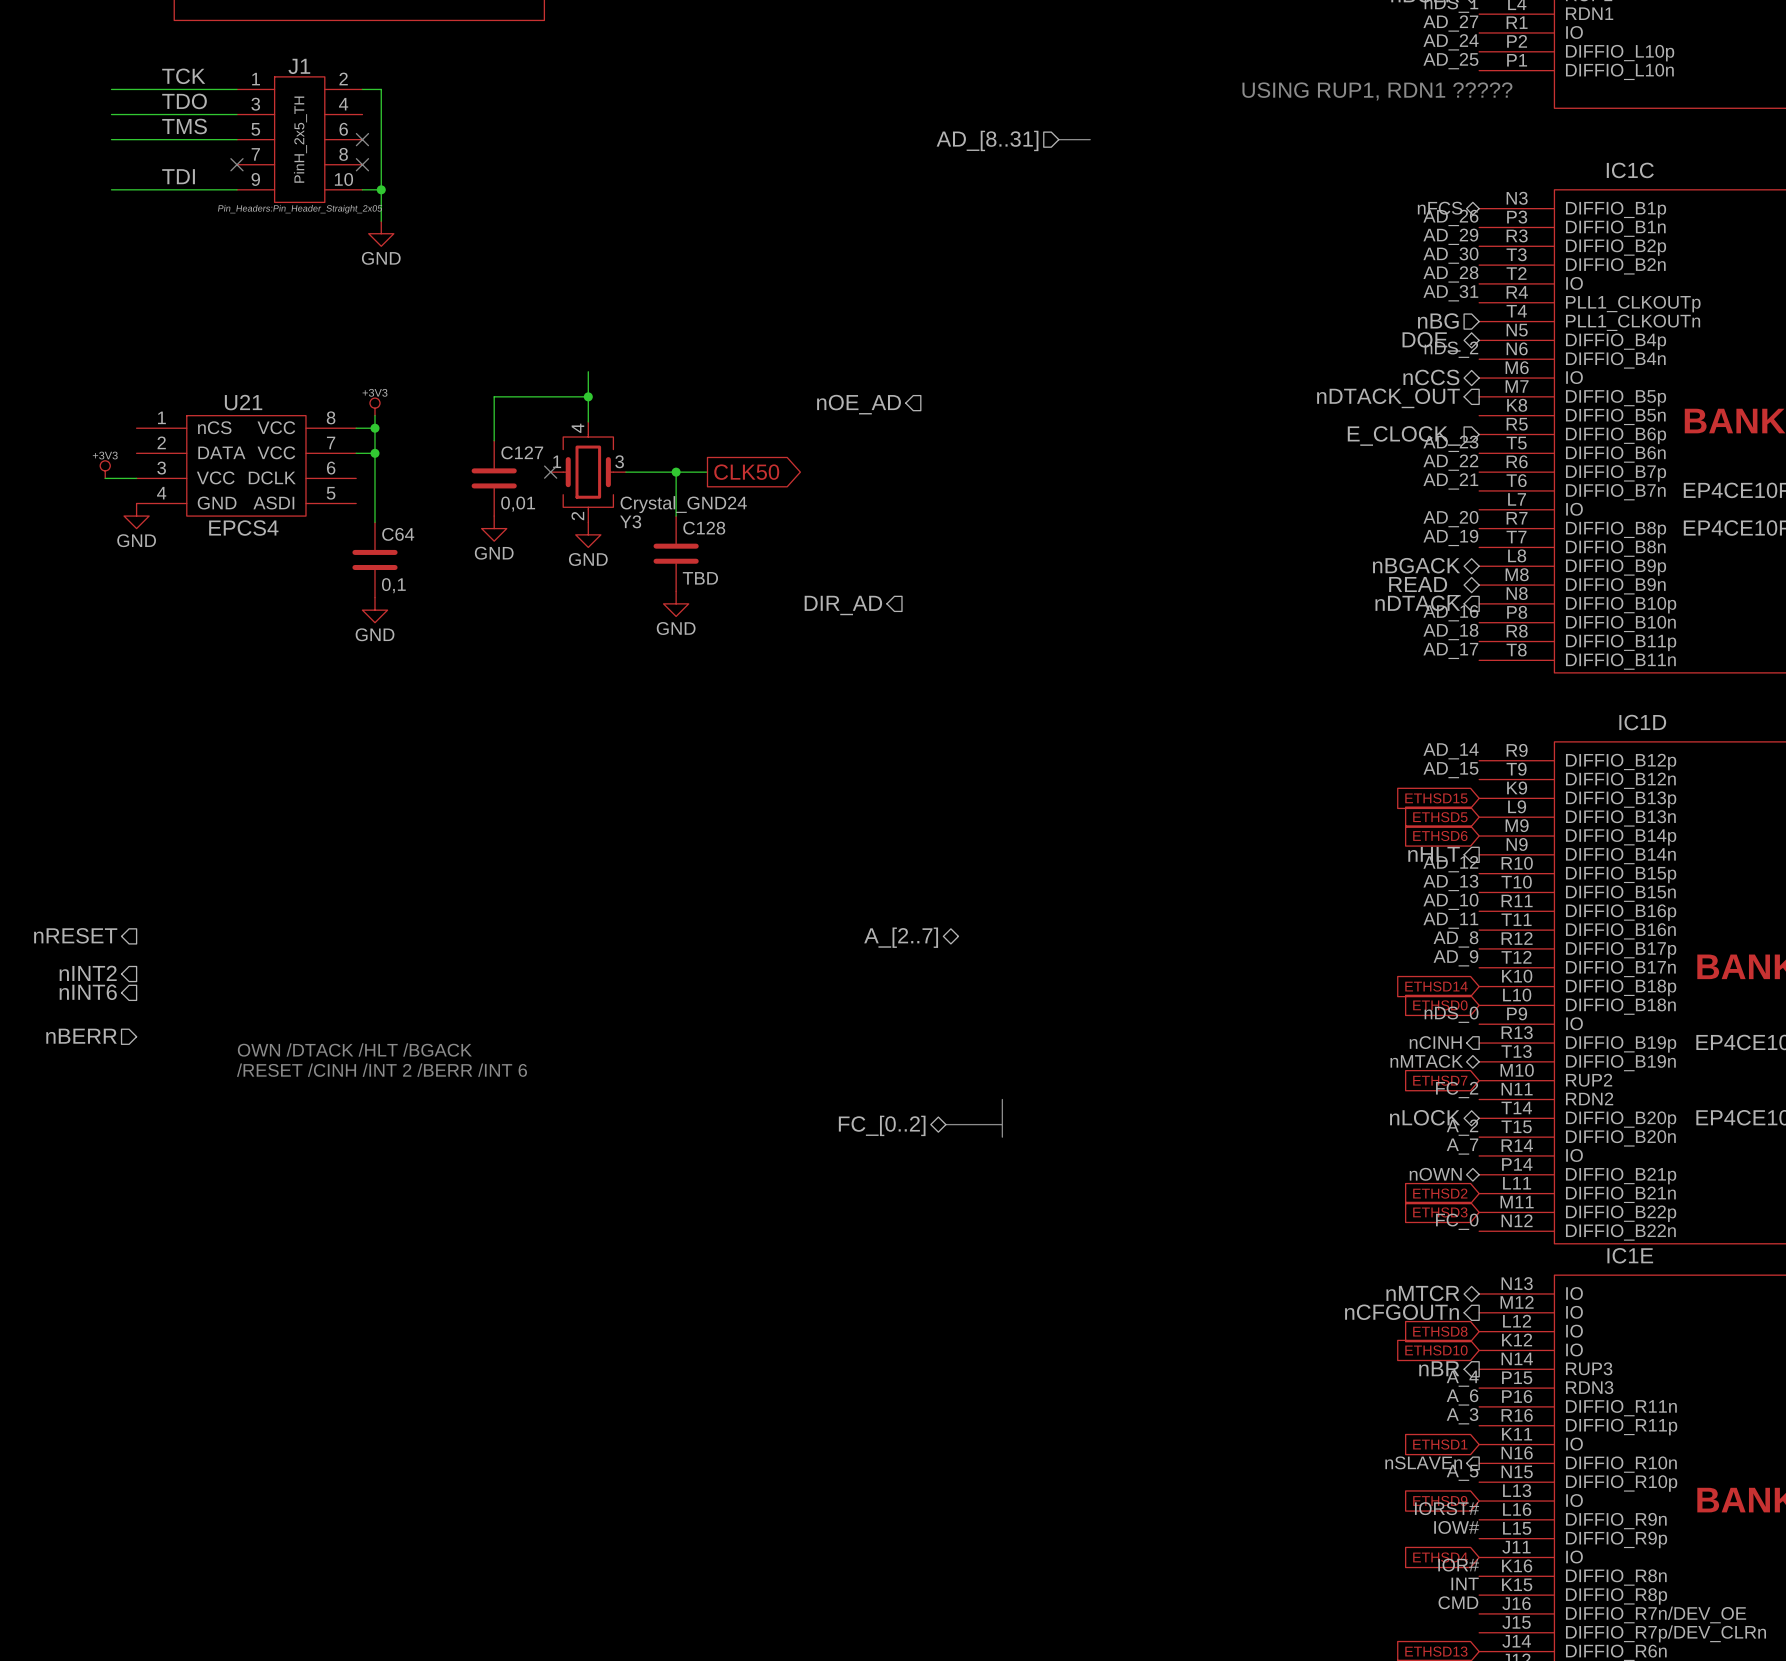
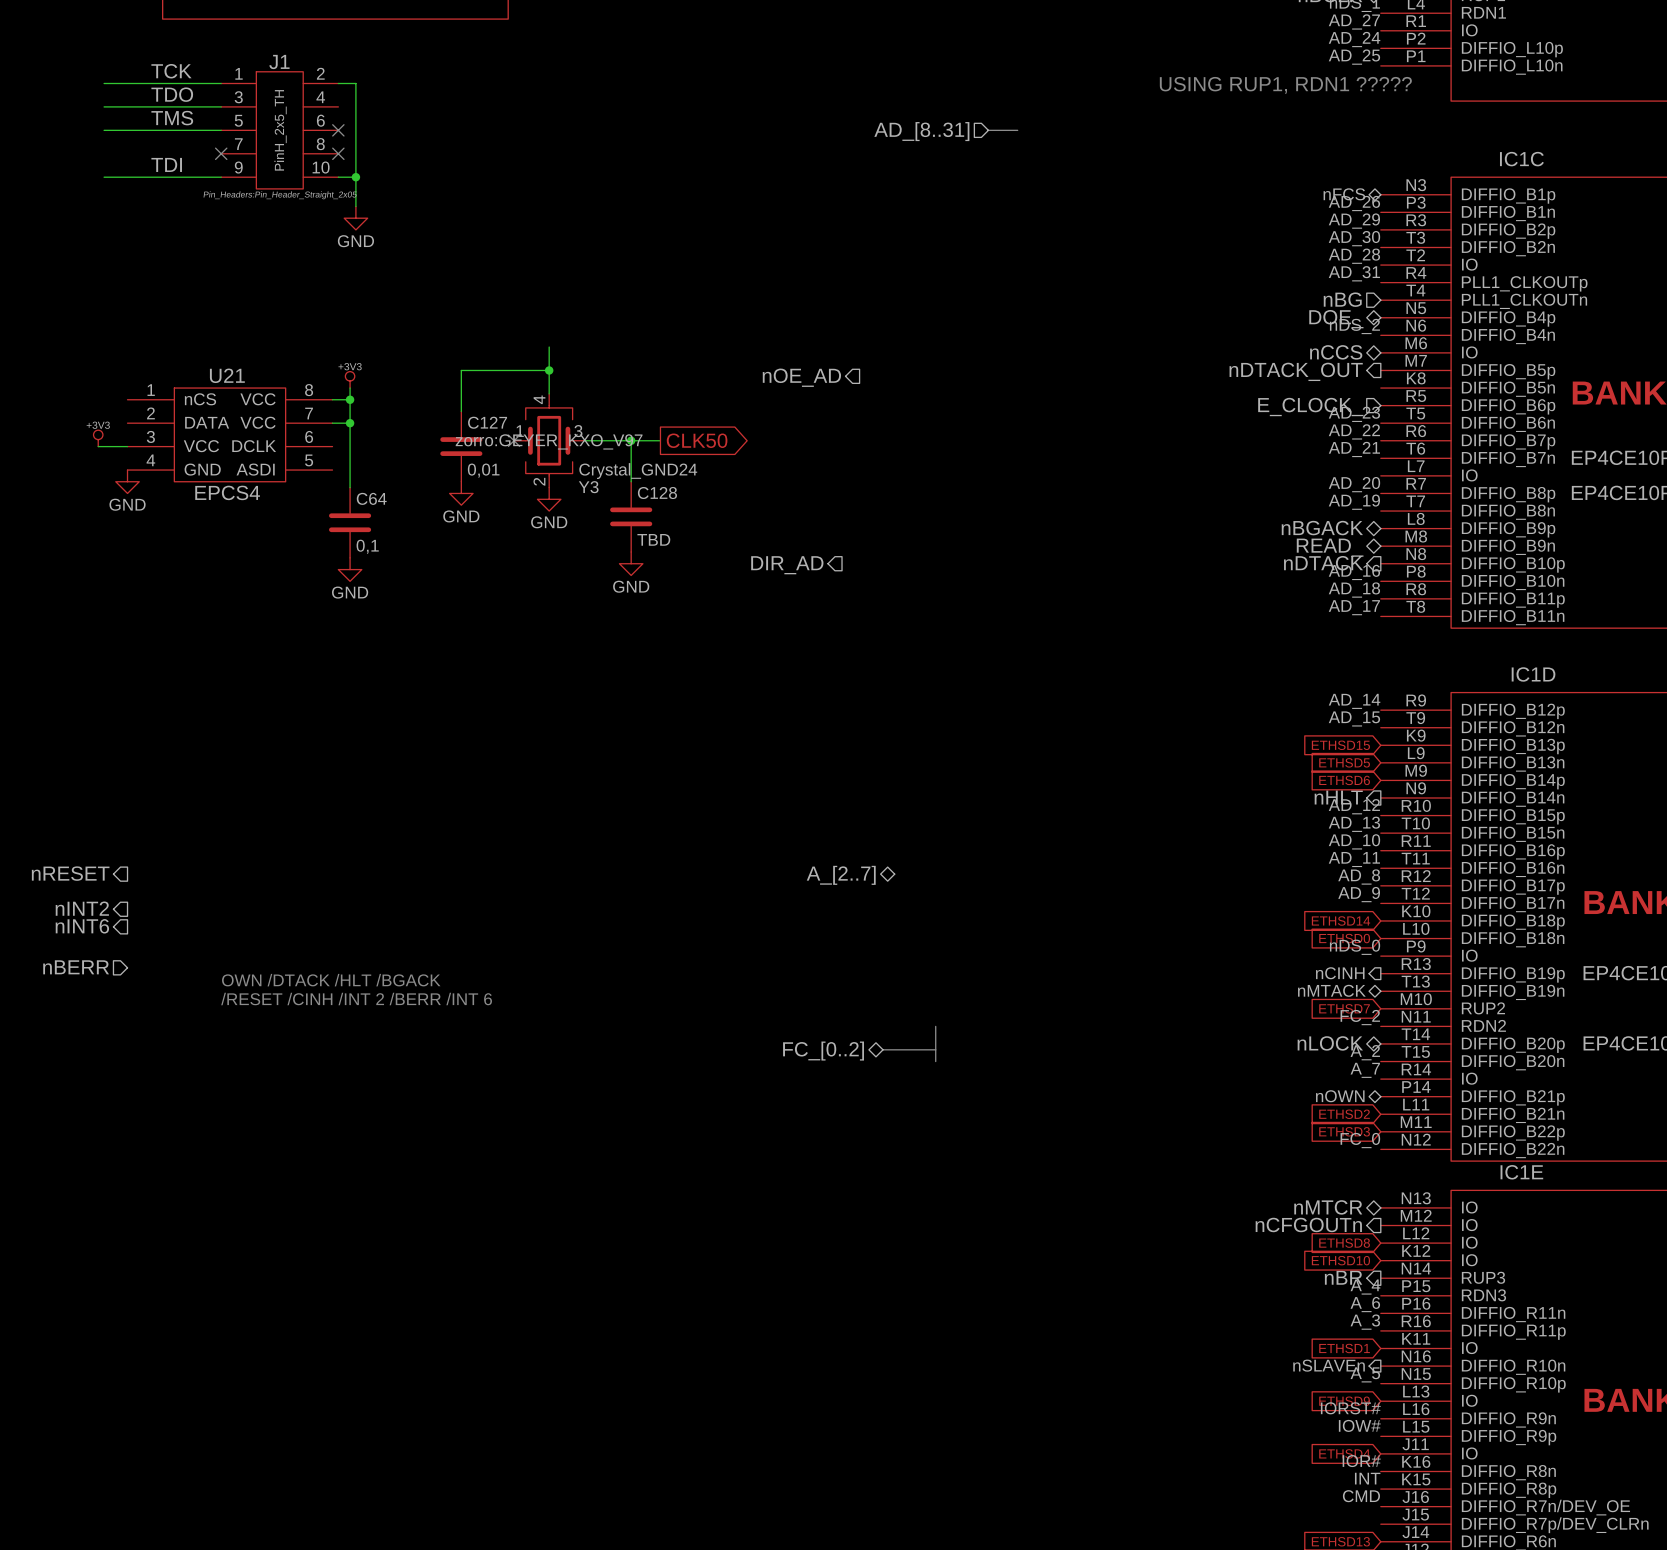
Y3 text: none -> zorro:GEYER_KXO_V97 (549, 441)

